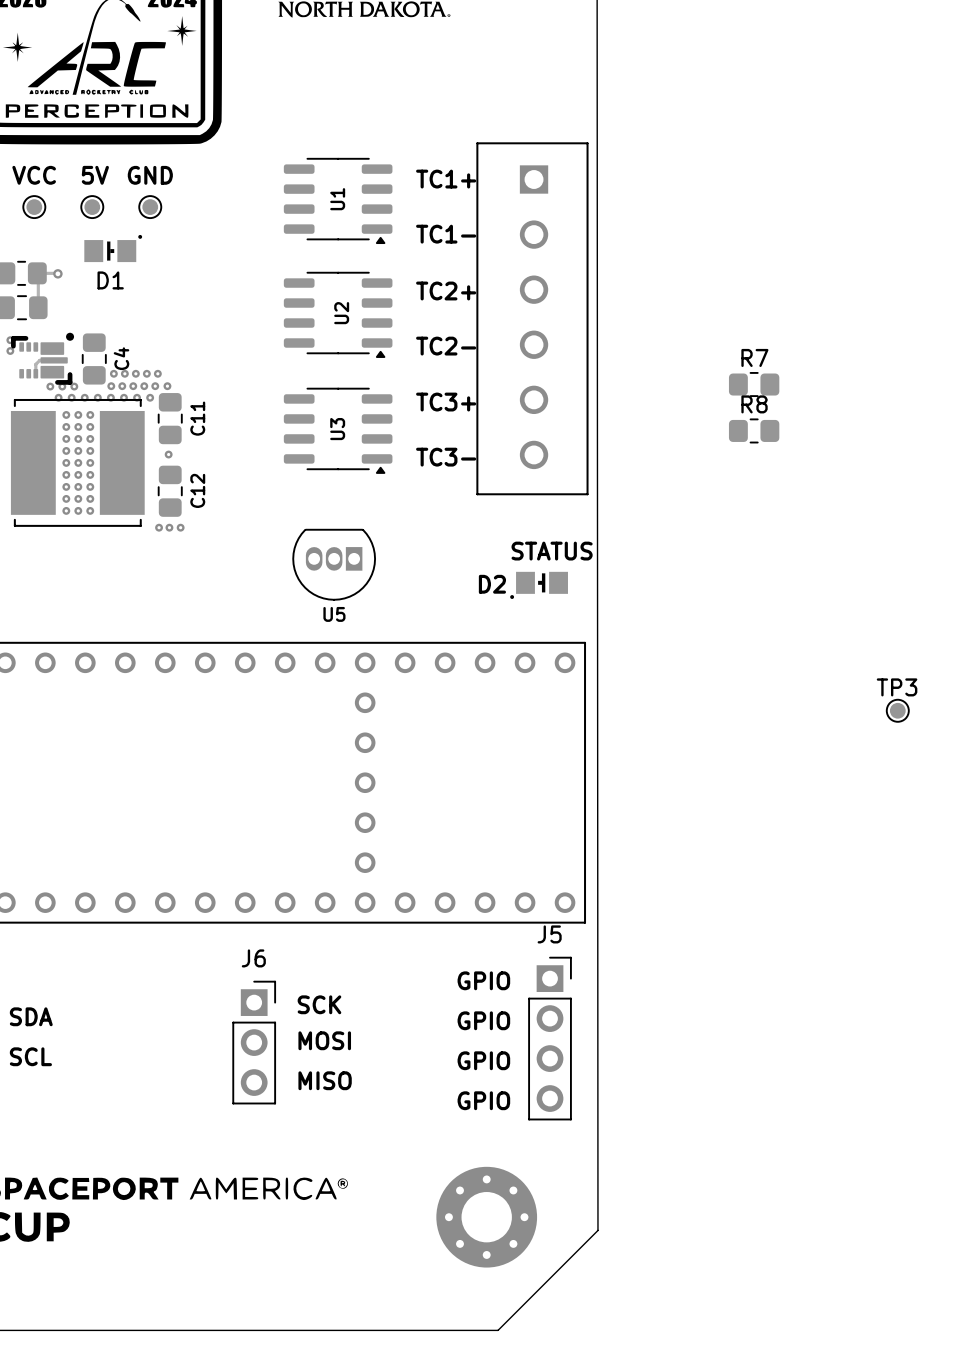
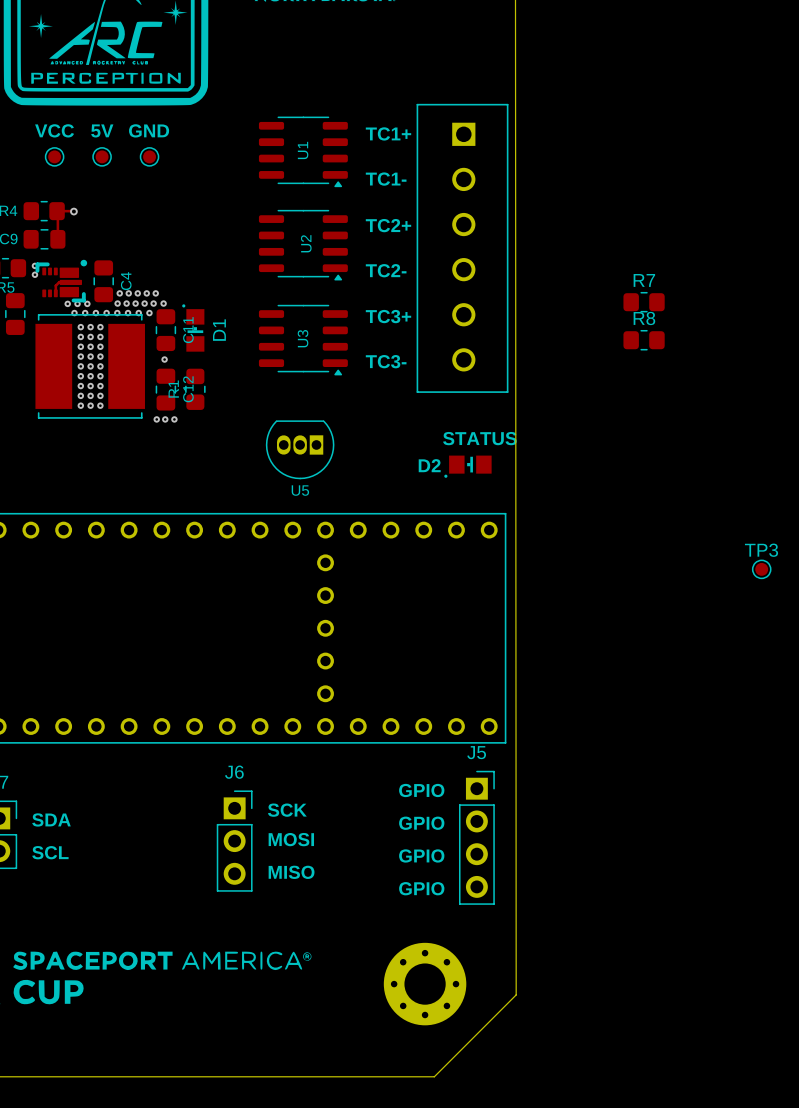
D1 rotation: 0° (113, 248) -> 90° counterclockwise (193, 327)
D1 position: (113, 248) -> (193, 327)
R1: none -> (195, 389)

